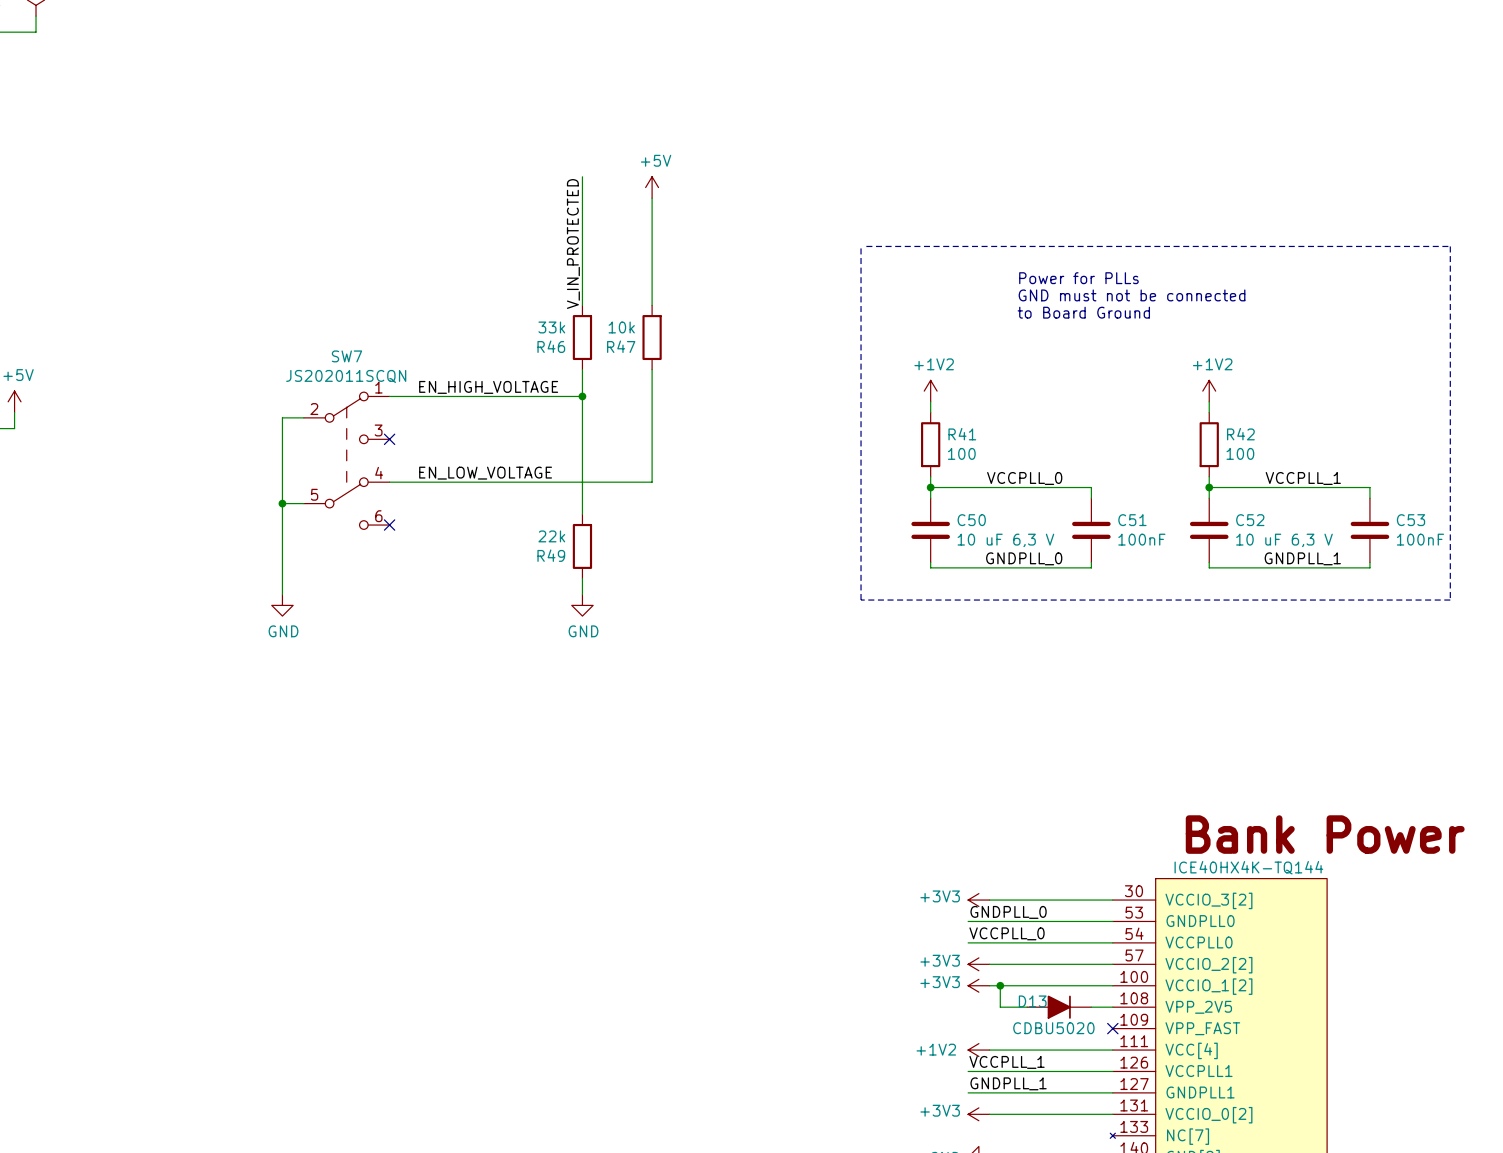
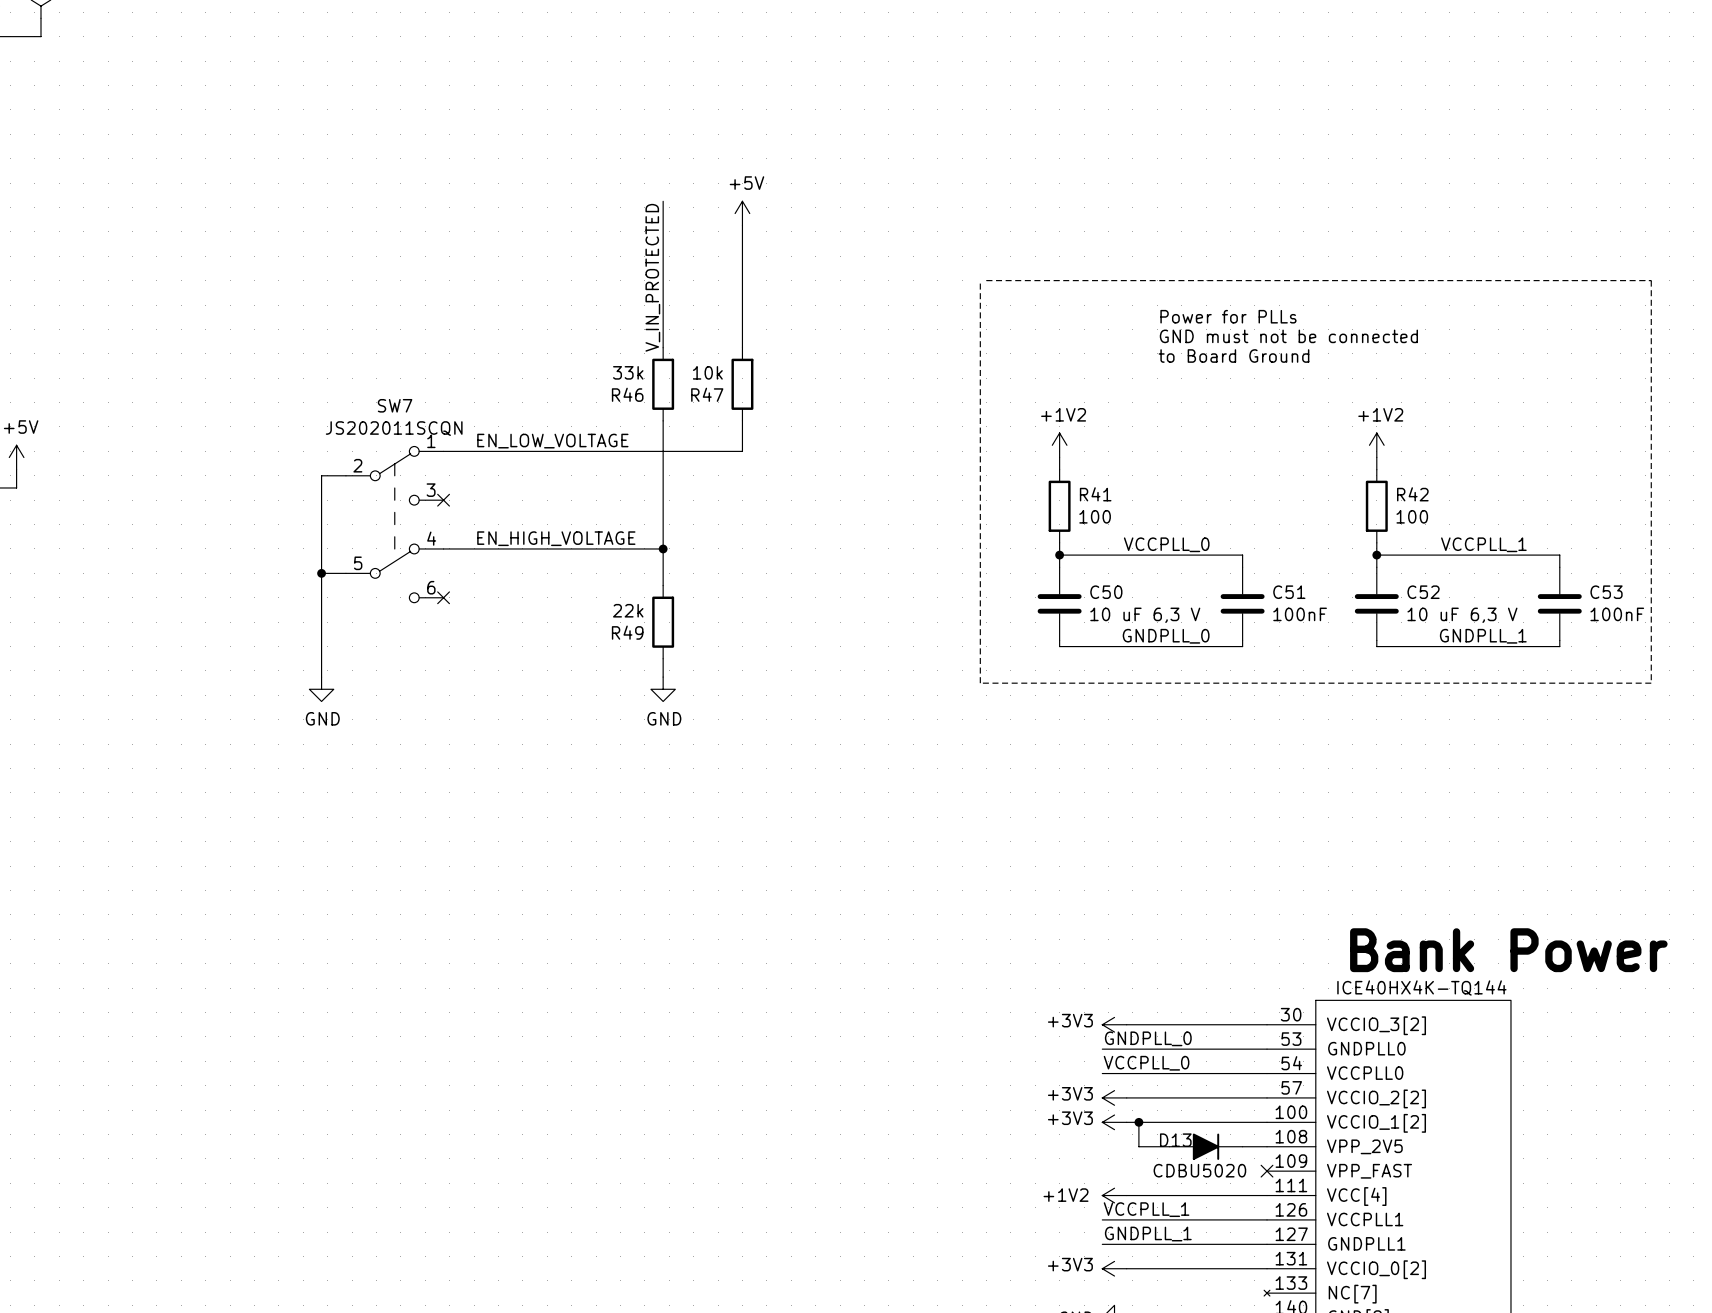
label: EN_HIGH_VOLTAGE (488, 387) -> EN_LOW_VOLTAGE (552, 441)
junction: (582, 396) -> none
wire: (652, 396) (652, 482) (582, 482) -> (742, 451) (663, 451)
label: EN_LOW_VOLTAGE (485, 473) -> EN_HIGH_VOLTAGE (556, 538)
junction: none -> (663, 548)

